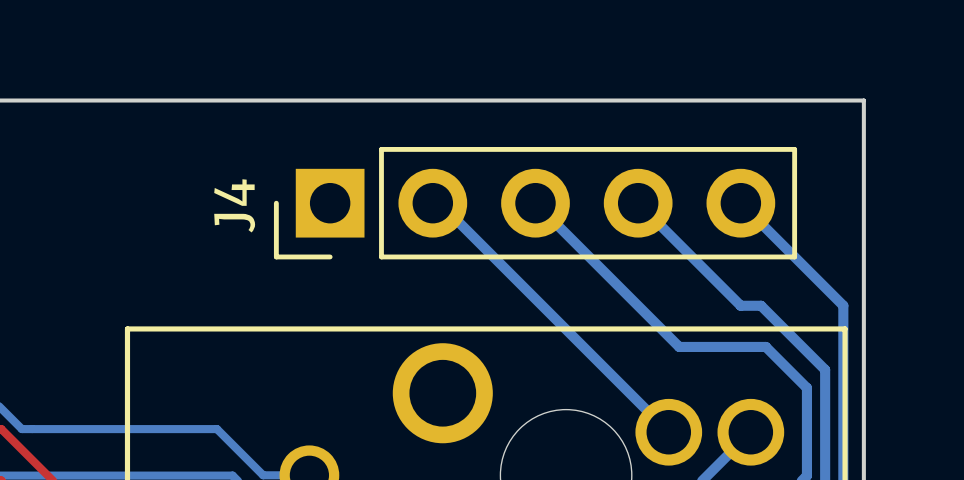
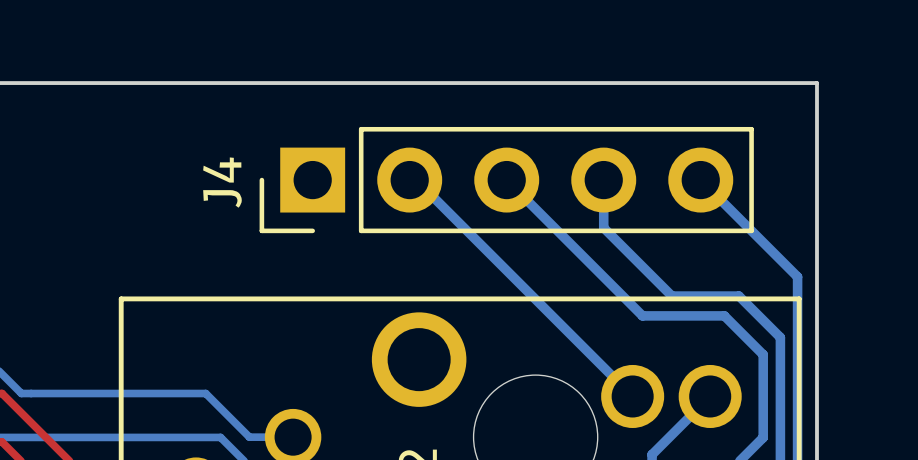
bottom track: (638, 203) (740, 305) (761, 305) (781, 325) -> (603, 180) (603, 227) (671, 296) (738, 296)

